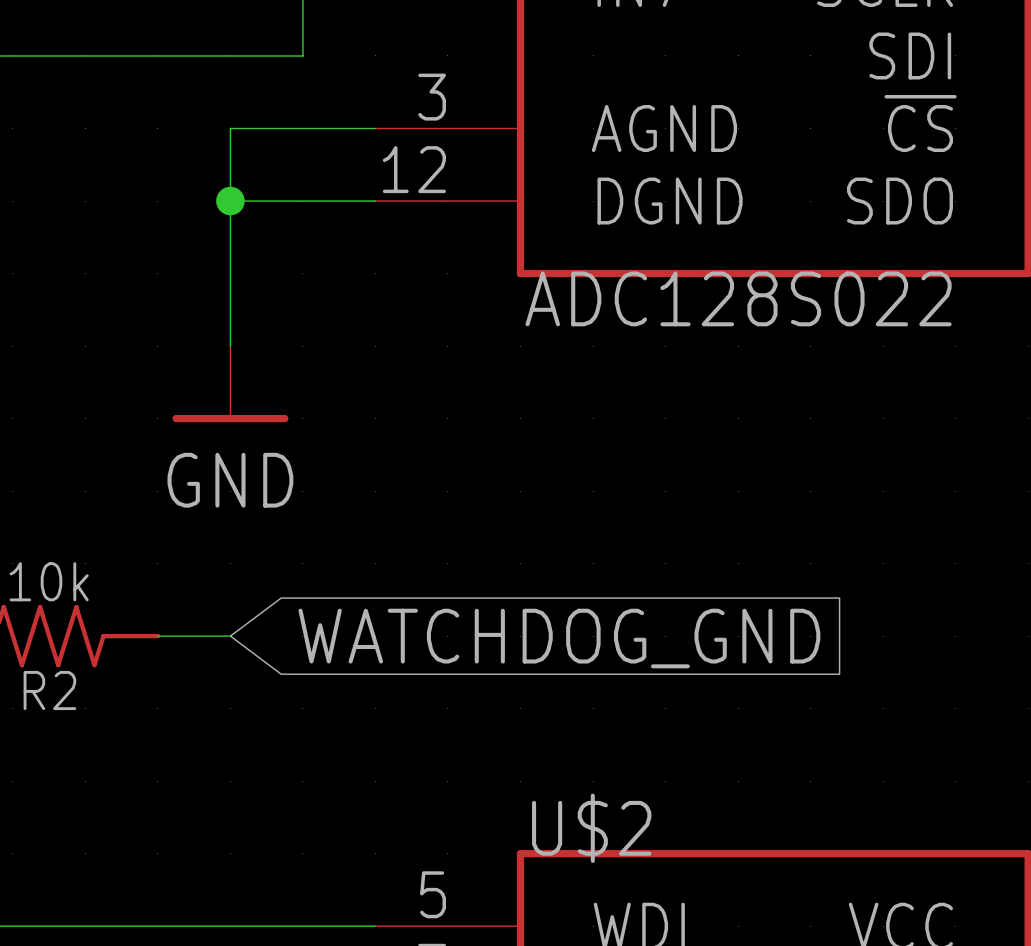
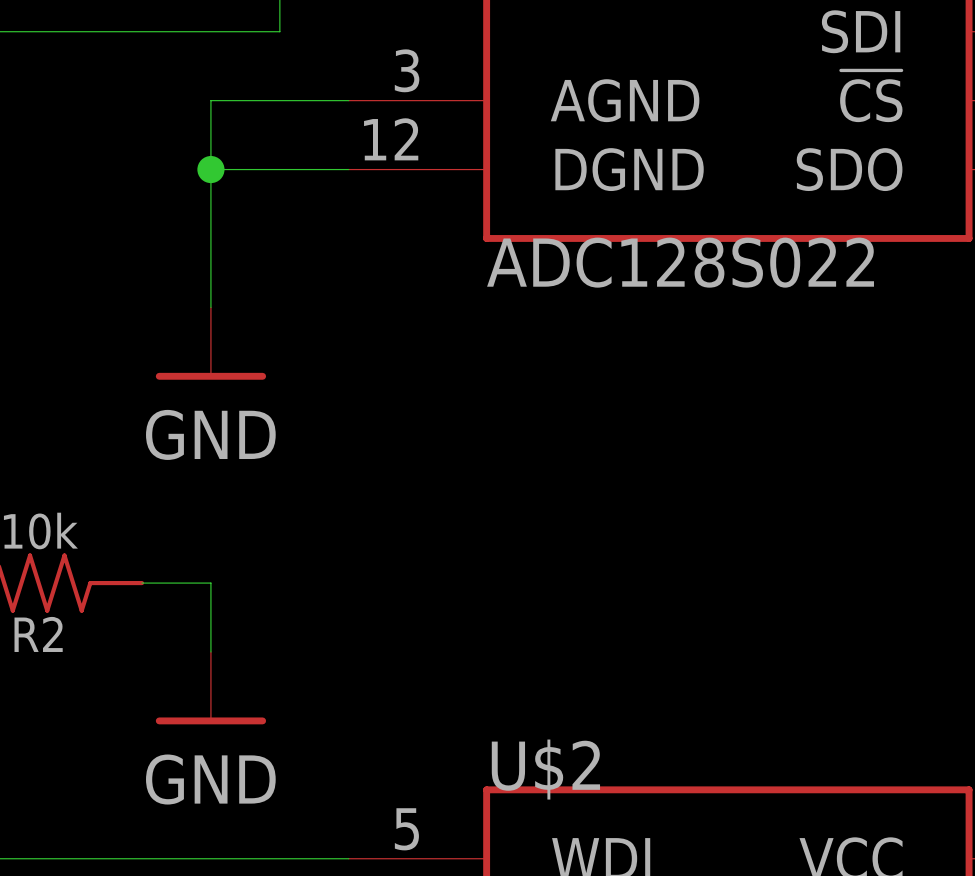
wire: none -> (210, 583) (210, 651)
global label: WATCHDOG_GND (559, 638) -> none
power symbol: none -> GND (210, 688)

